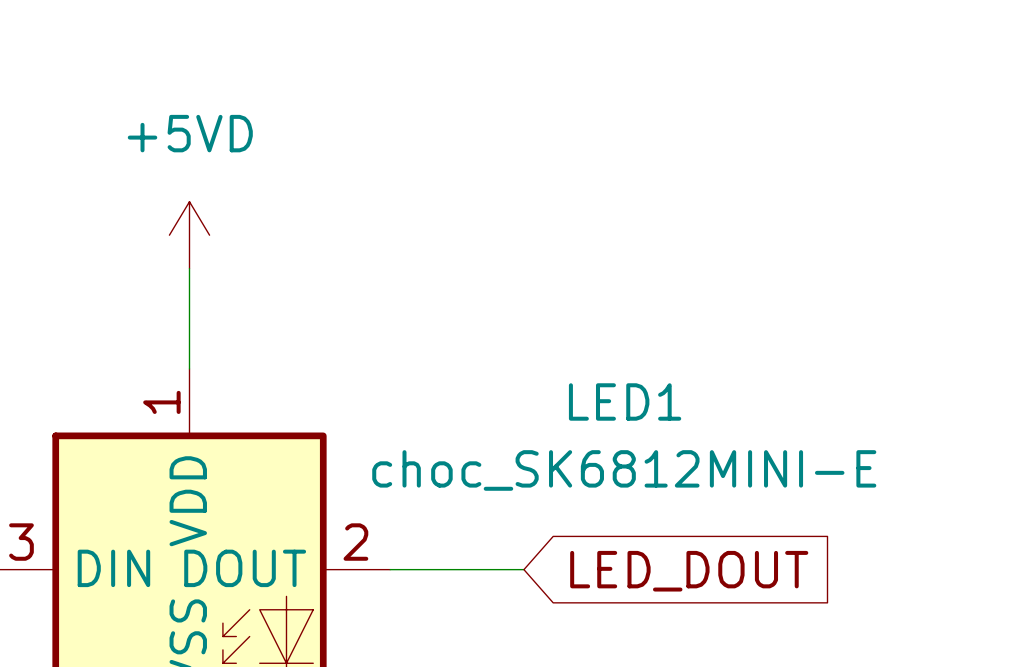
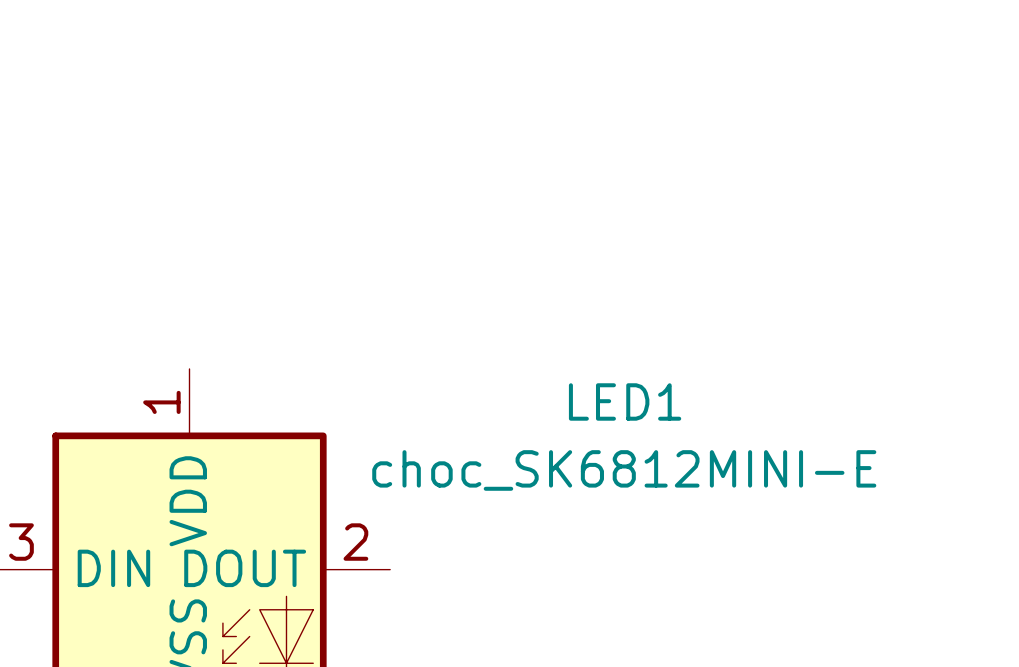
power symbol: +5VD (189, 235) -> none
wire: (189, 268) (189, 368) -> none
wire: (390, 569) (523, 569) -> none
global label: LED_DOUT (689, 571) -> none

